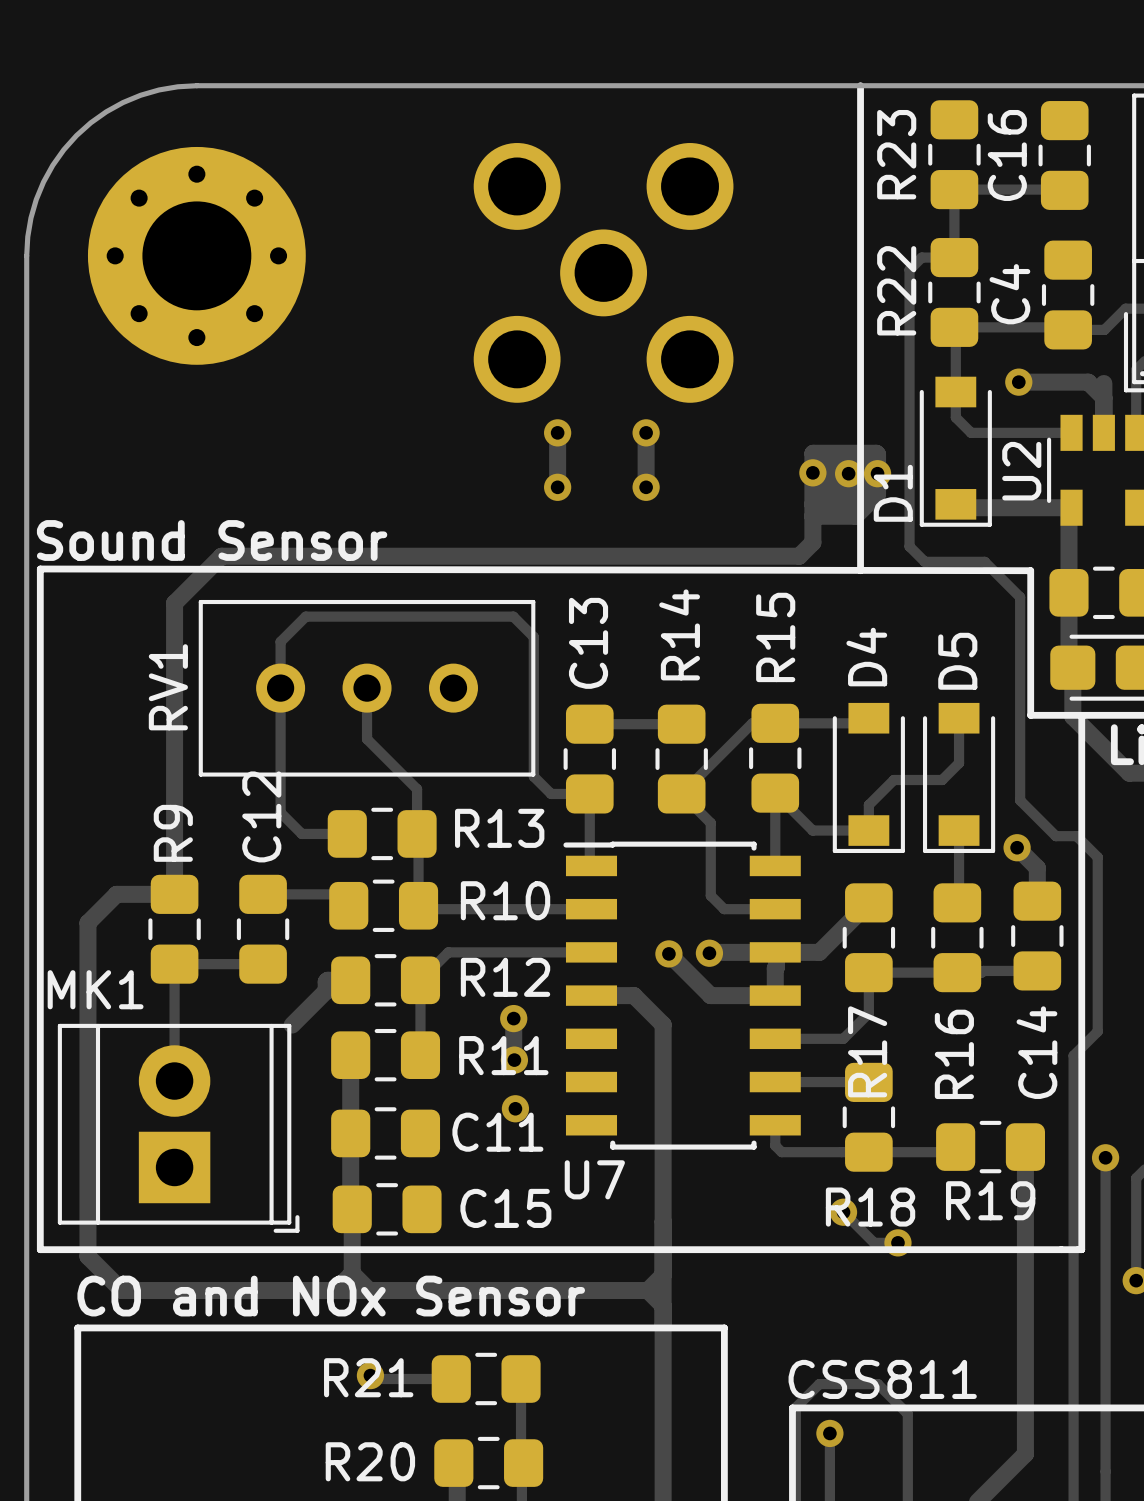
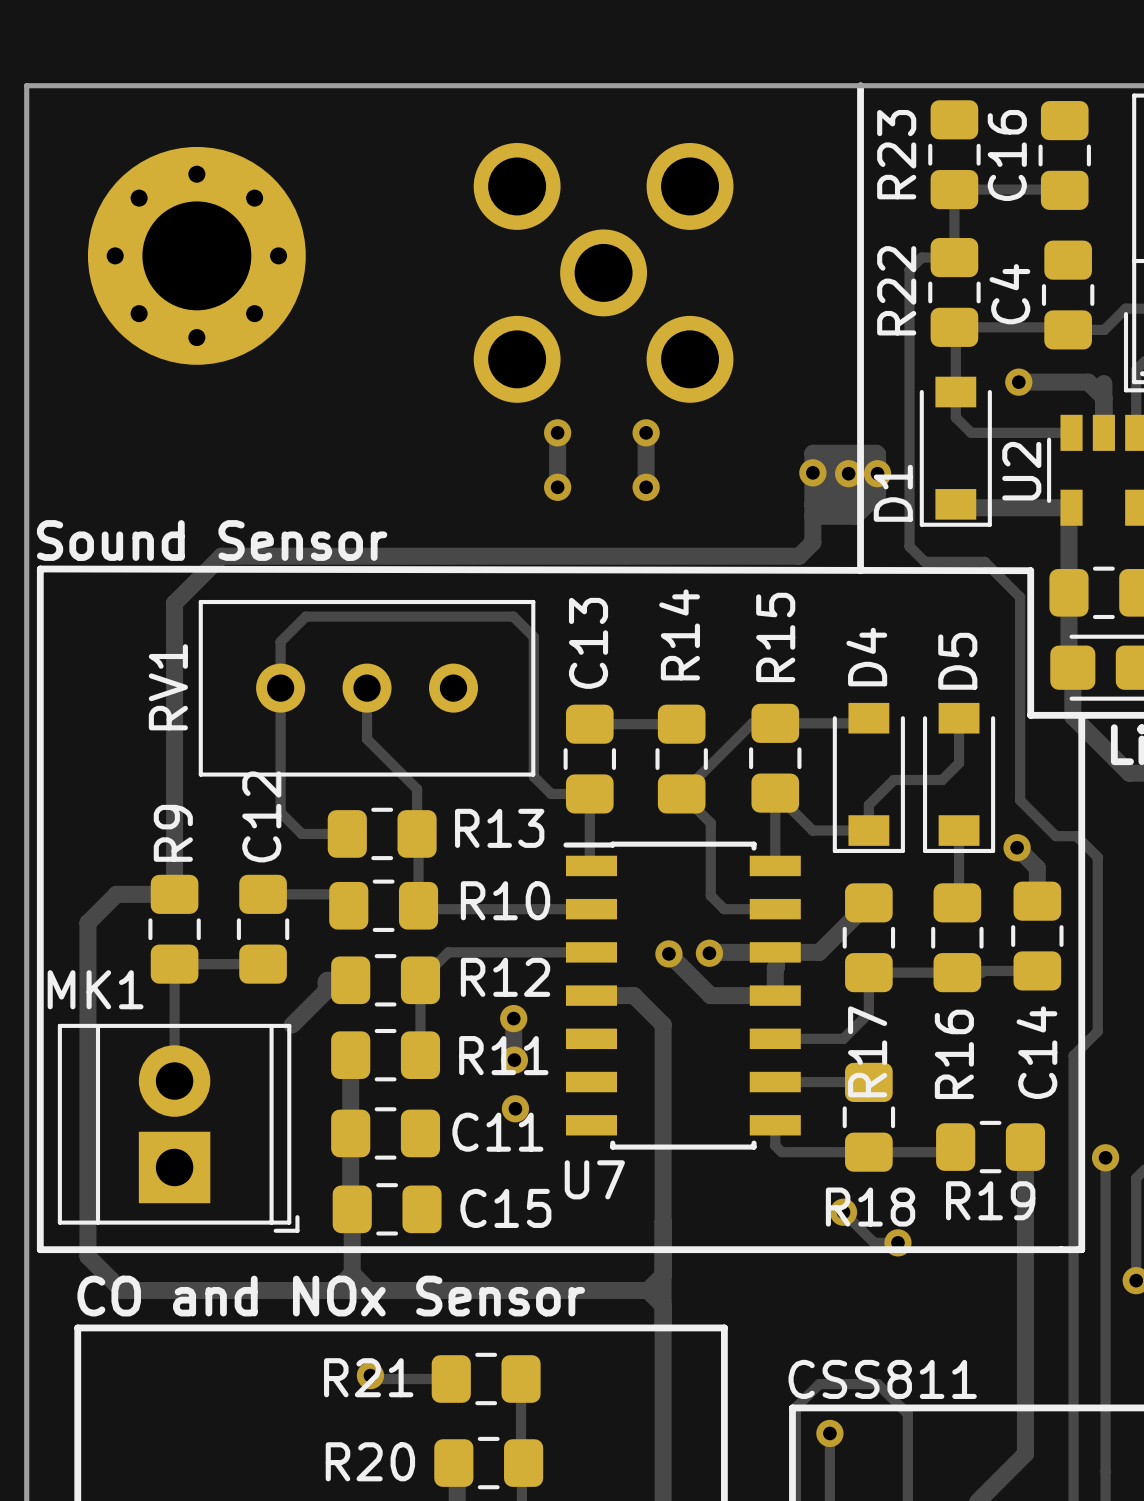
board edge: (196, 85) (159, 89) (123, 102) (90, 122) (76, 135) (52, 165) (36, 199) (27, 236) (26, 255) -> (196, 85) (26, 85) (26, 255)

